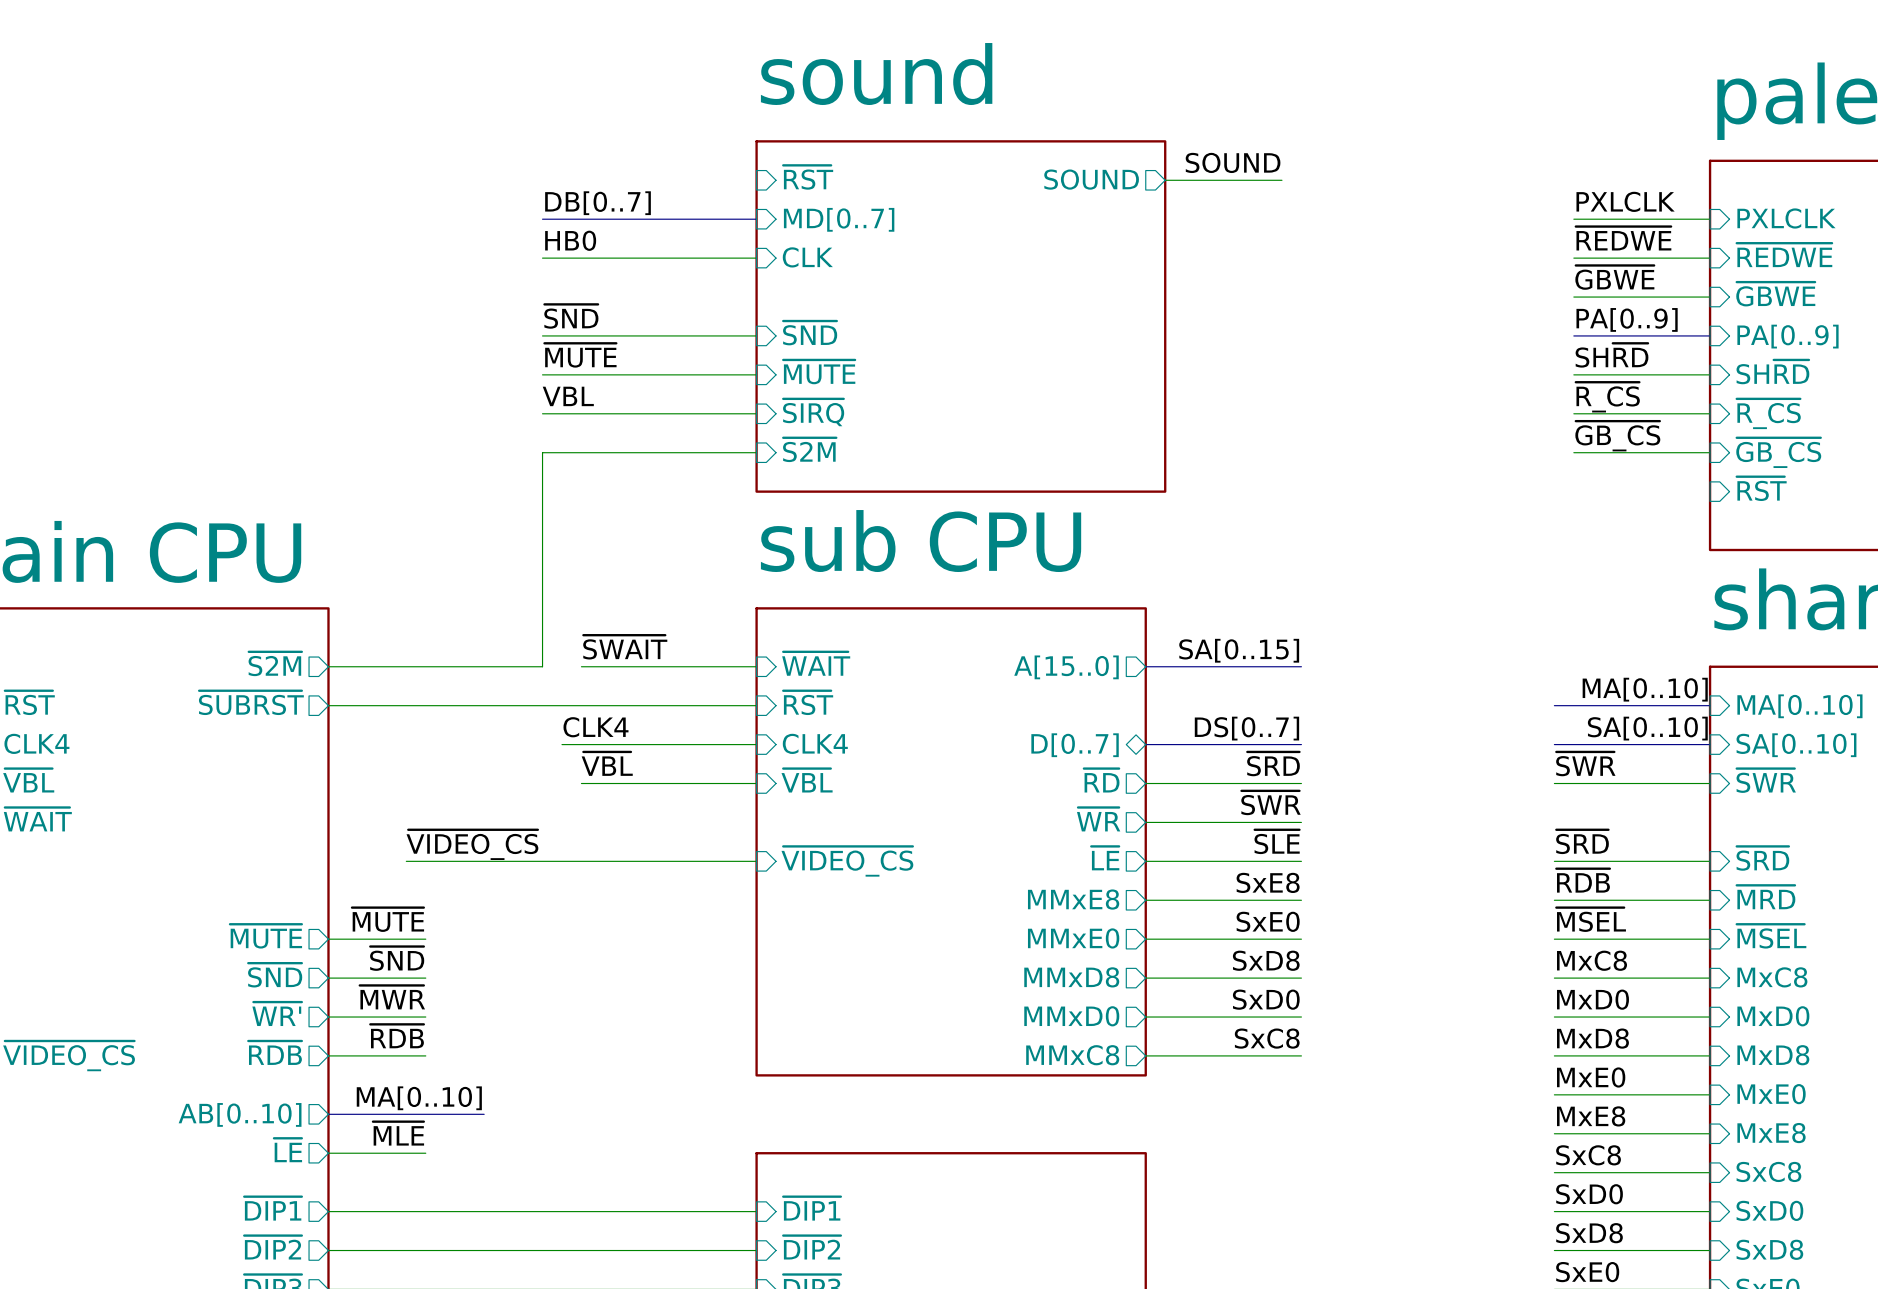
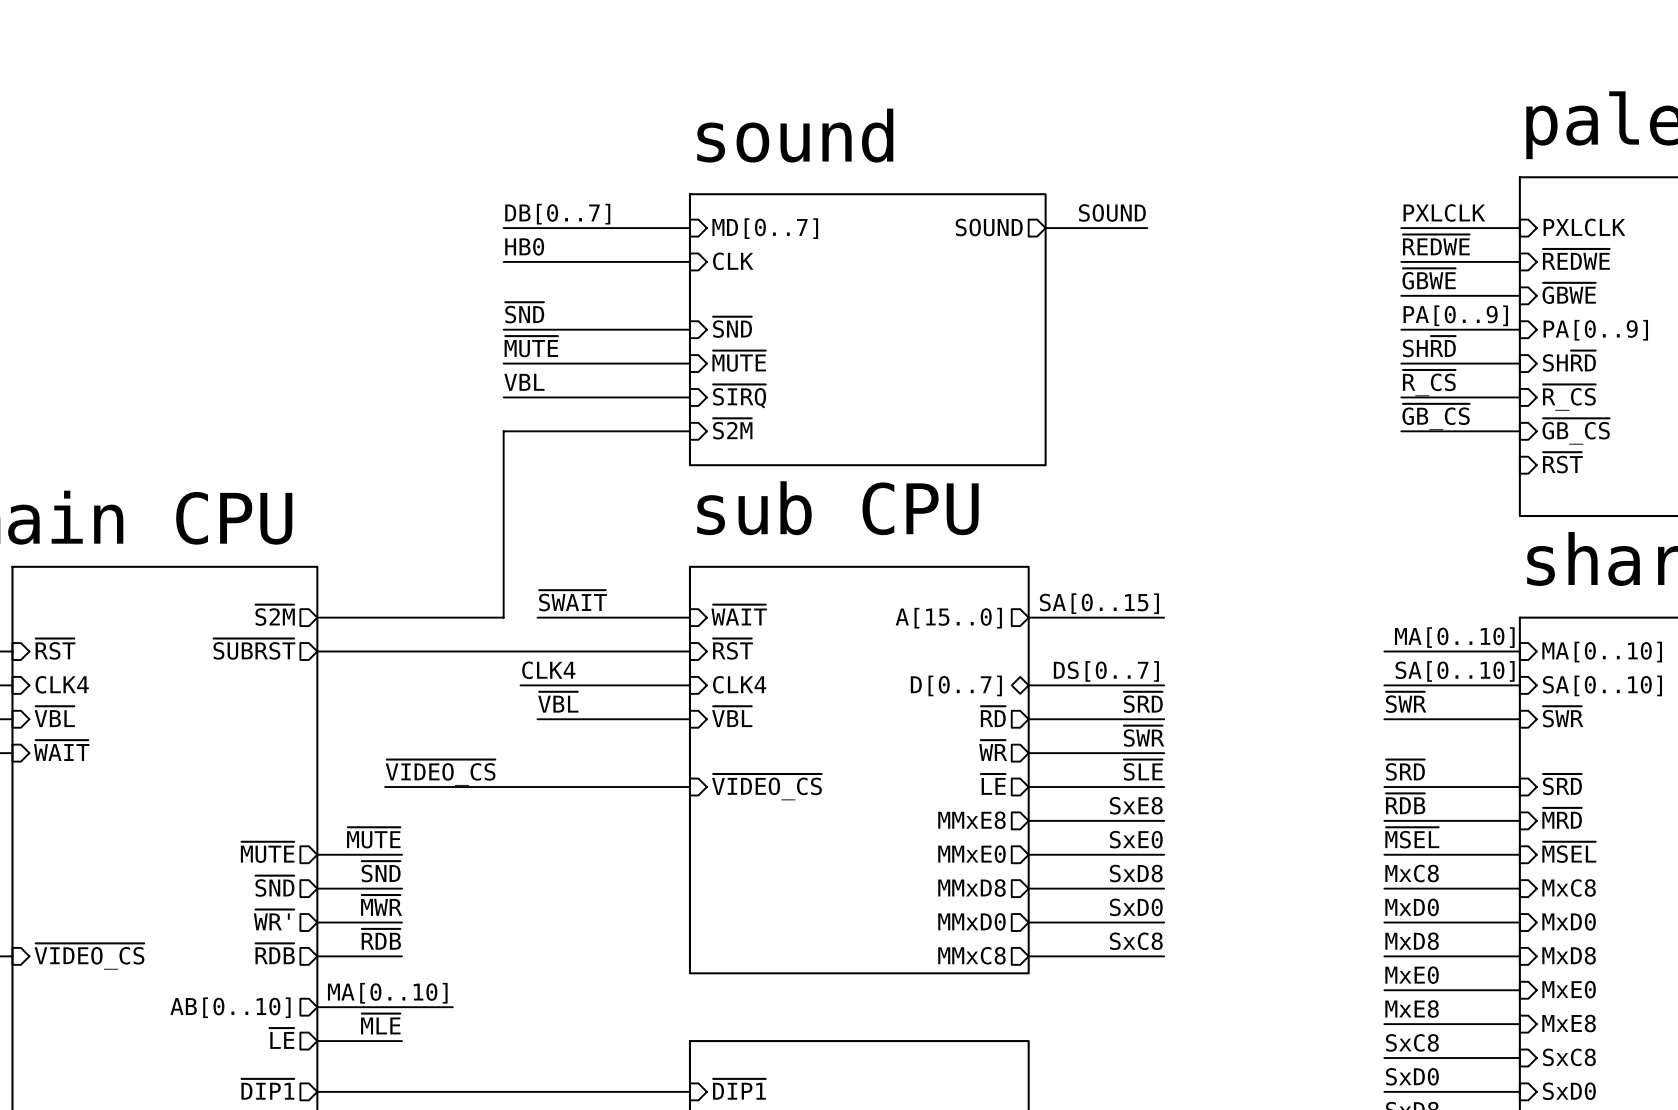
label position: SOUND (1233, 162) -> SOUND (1112, 212)
sheet pin: ~{RST} (808, 177) -> none
sheet pin position: SOUND (1091, 179) -> SOUND (989, 227)
wire: (1165, 180) (1281, 180) -> (1045, 228) (1147, 228)
sheet sound: (960, 316) -> none
sheet sound: none -> (867, 329)

